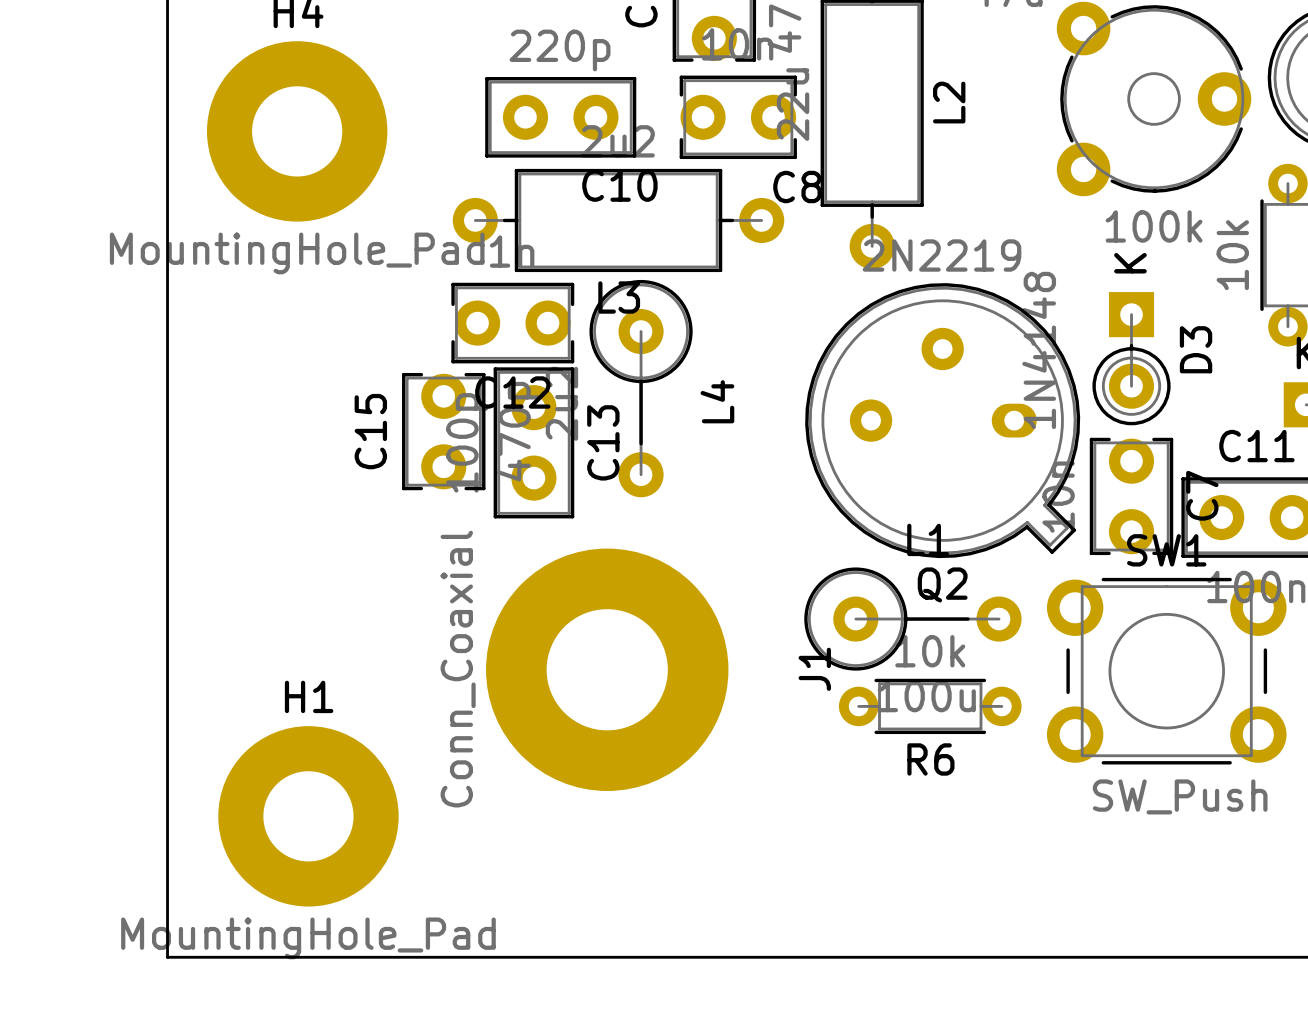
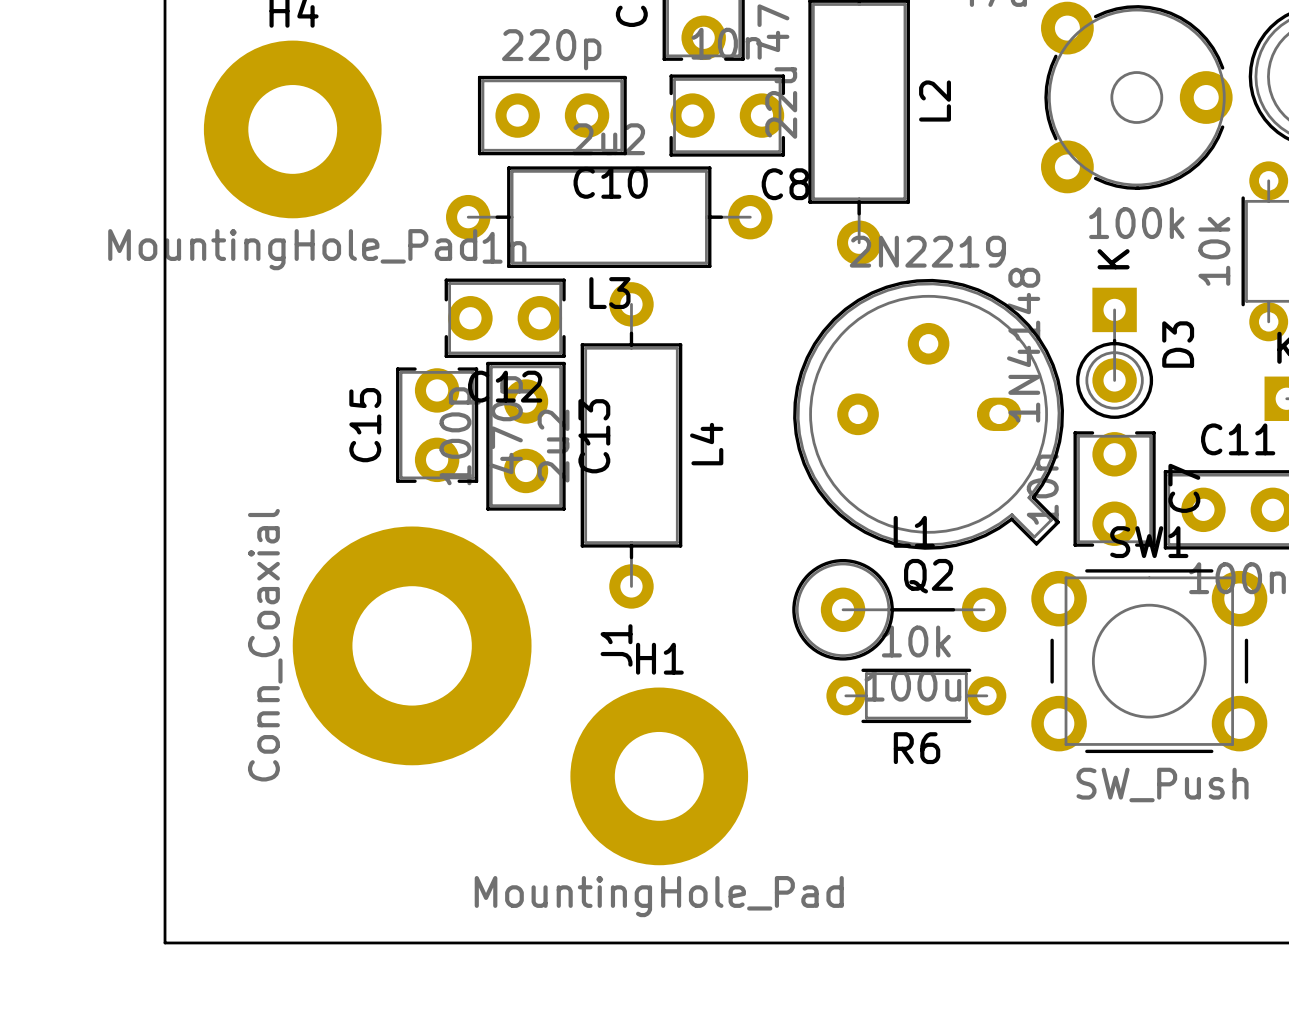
L4 footprint: [589, 279, 693, 498] -> [580, 282, 683, 609]
J1 position: (607, 669) -> (412, 645)
H1 position: (308, 816) -> (659, 776)

